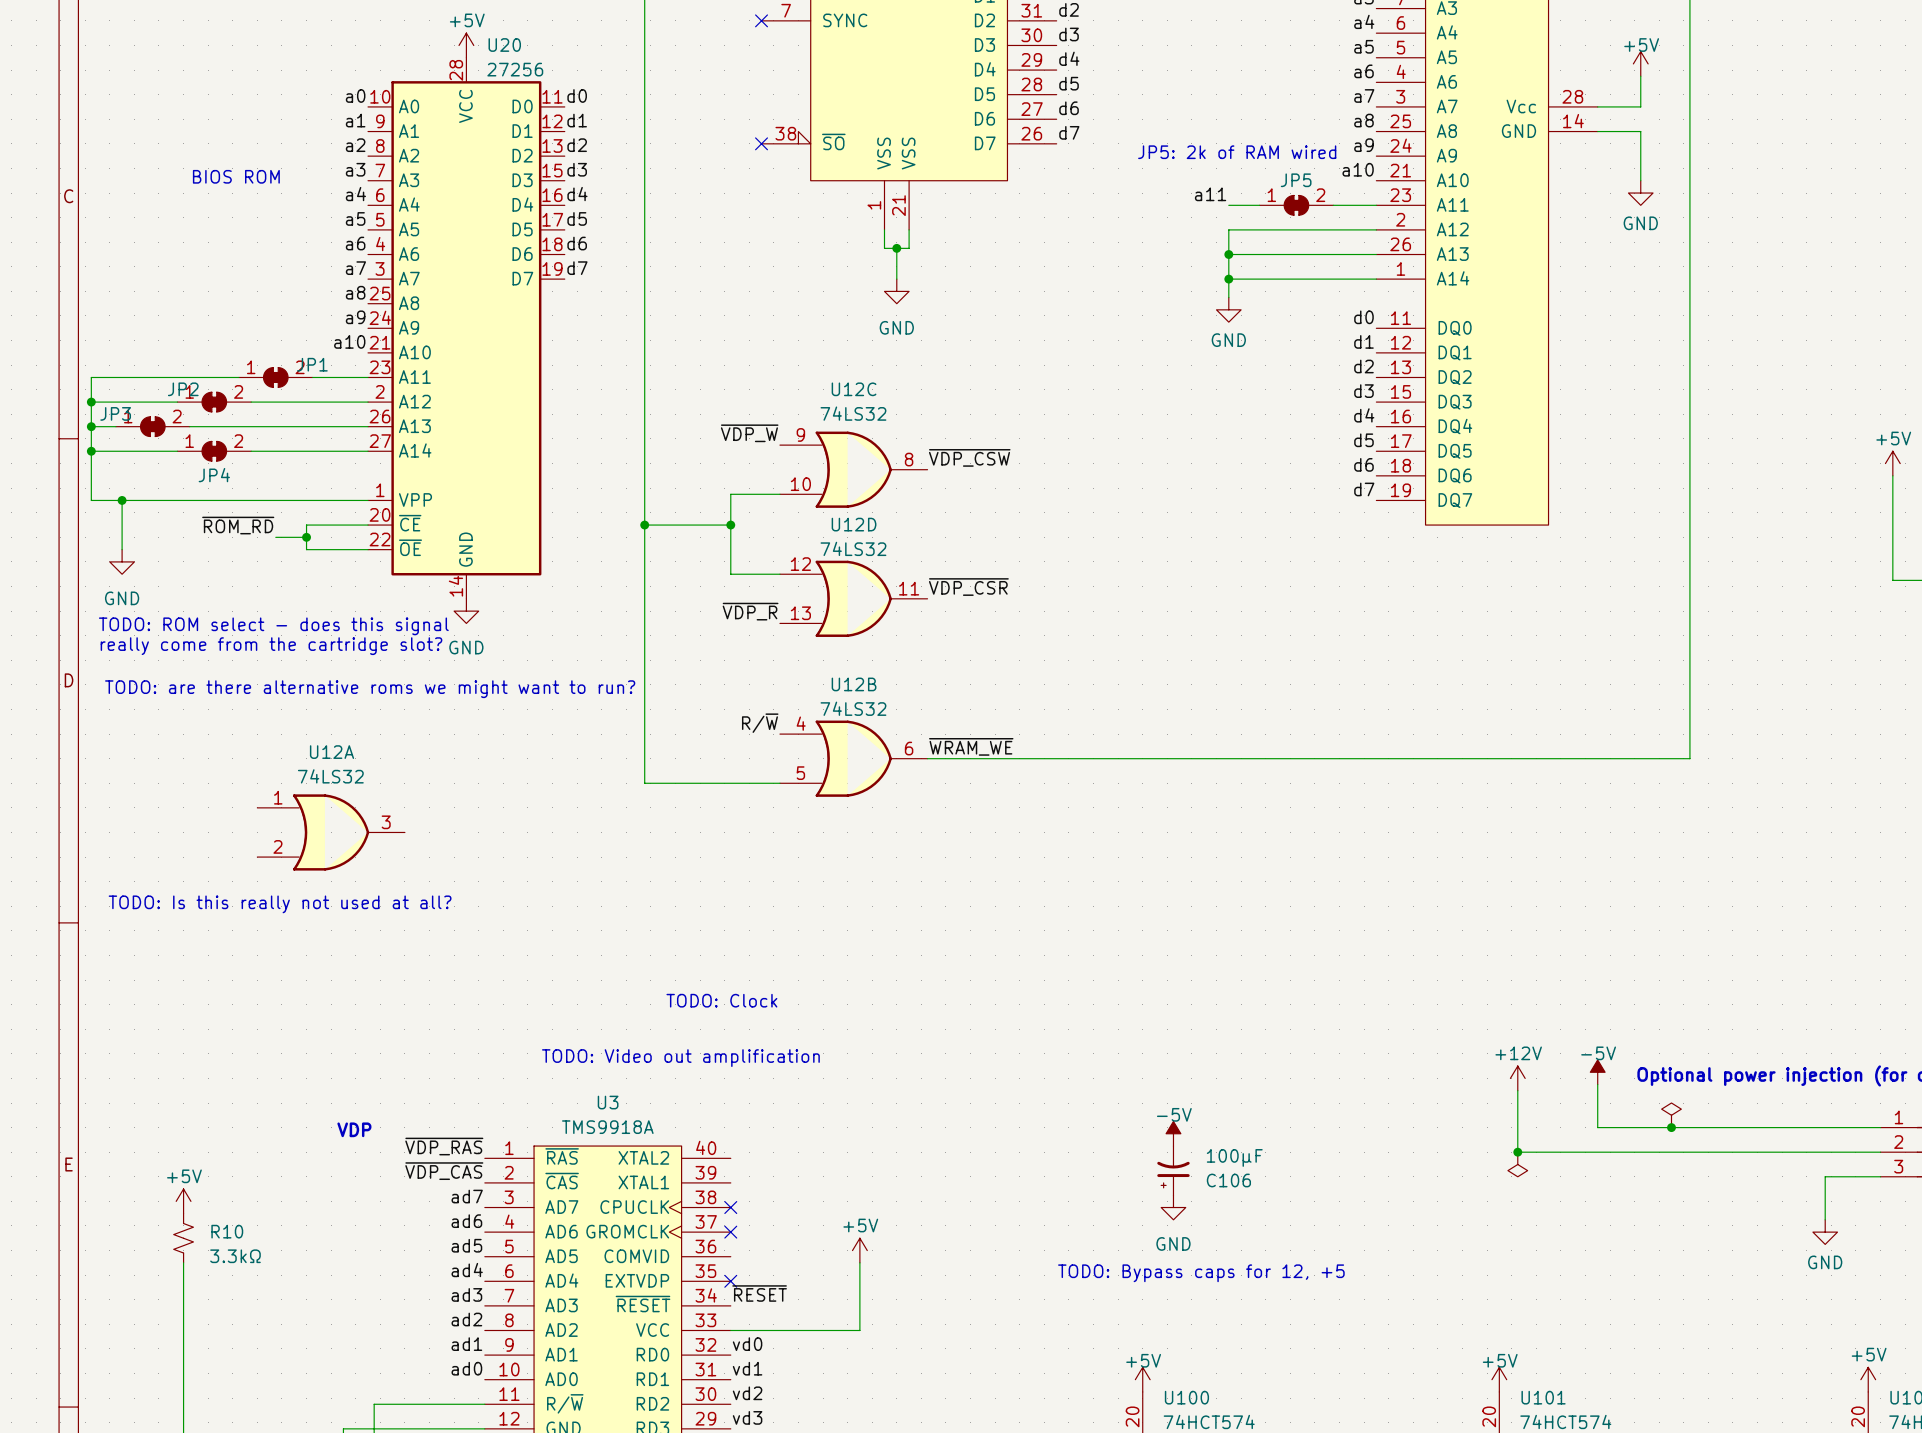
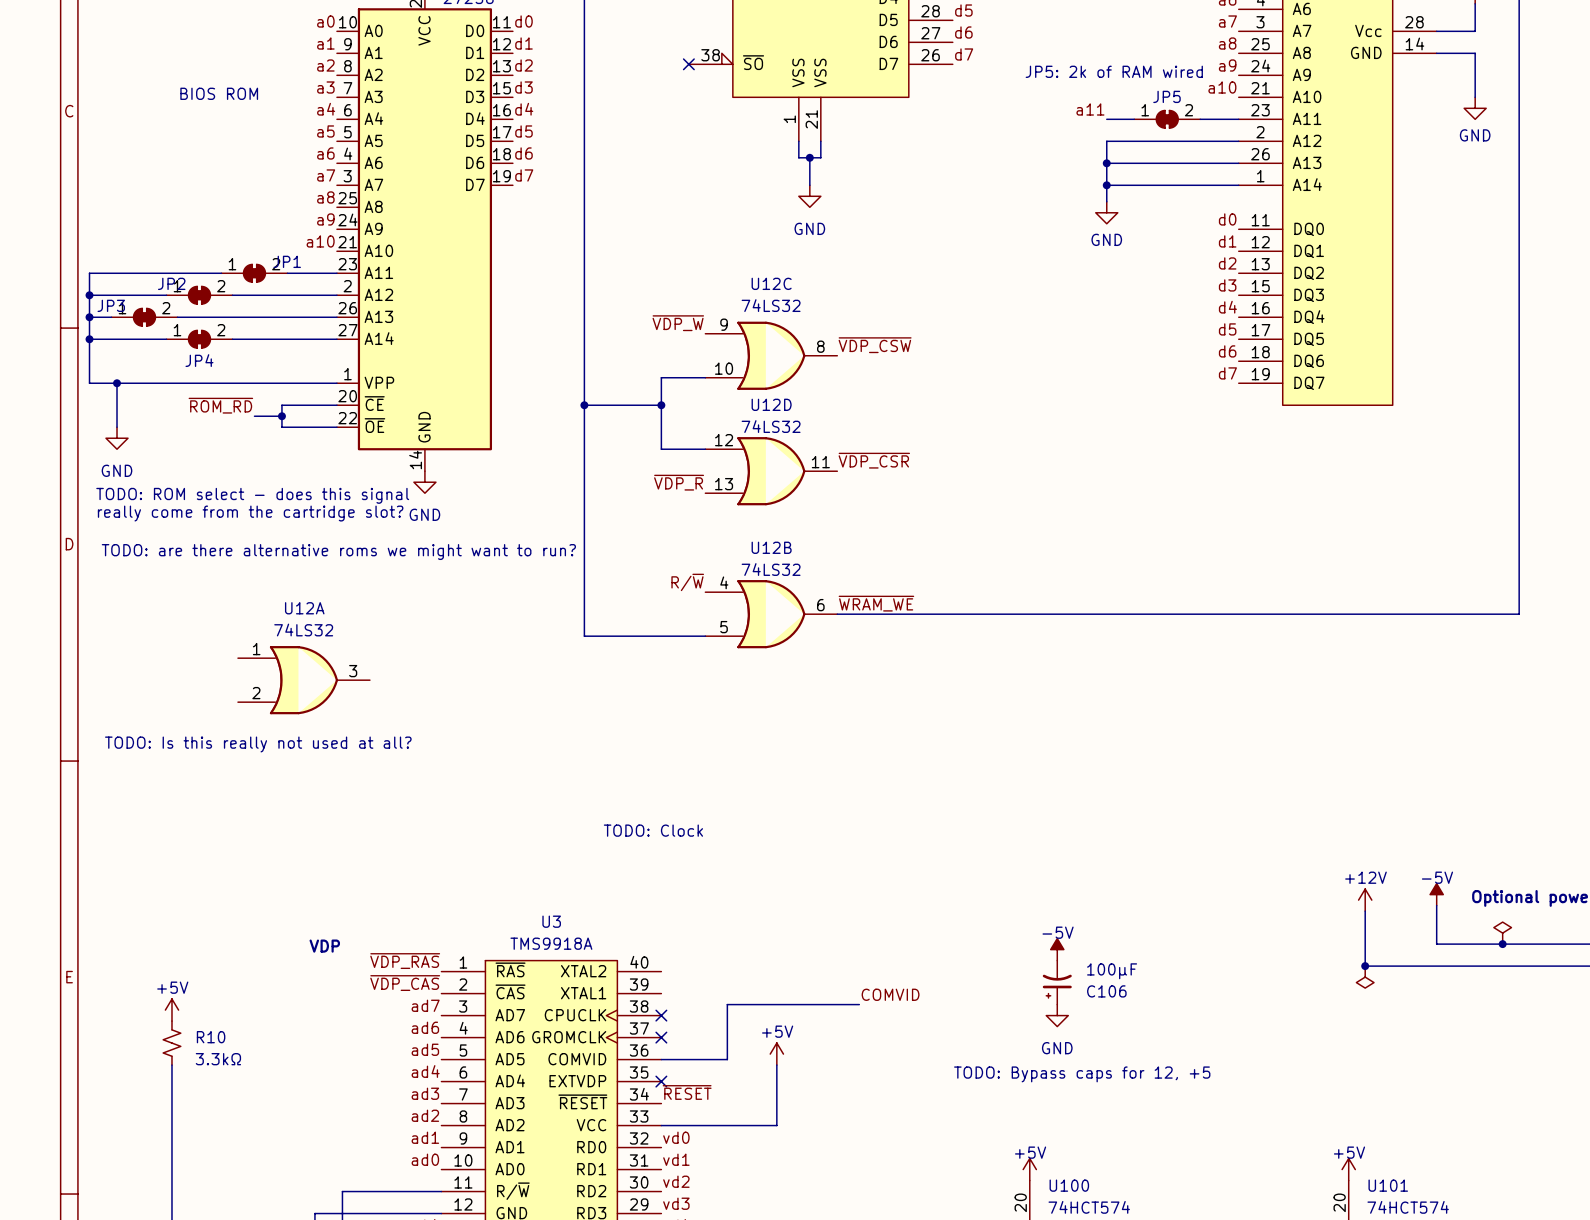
text: TODO: Video out amplification (680, 1058) -> none
label: none -> COMVID (890, 994)
wire: none -> (859, 1004) (727, 1004) (727, 1059) (661, 1059)

